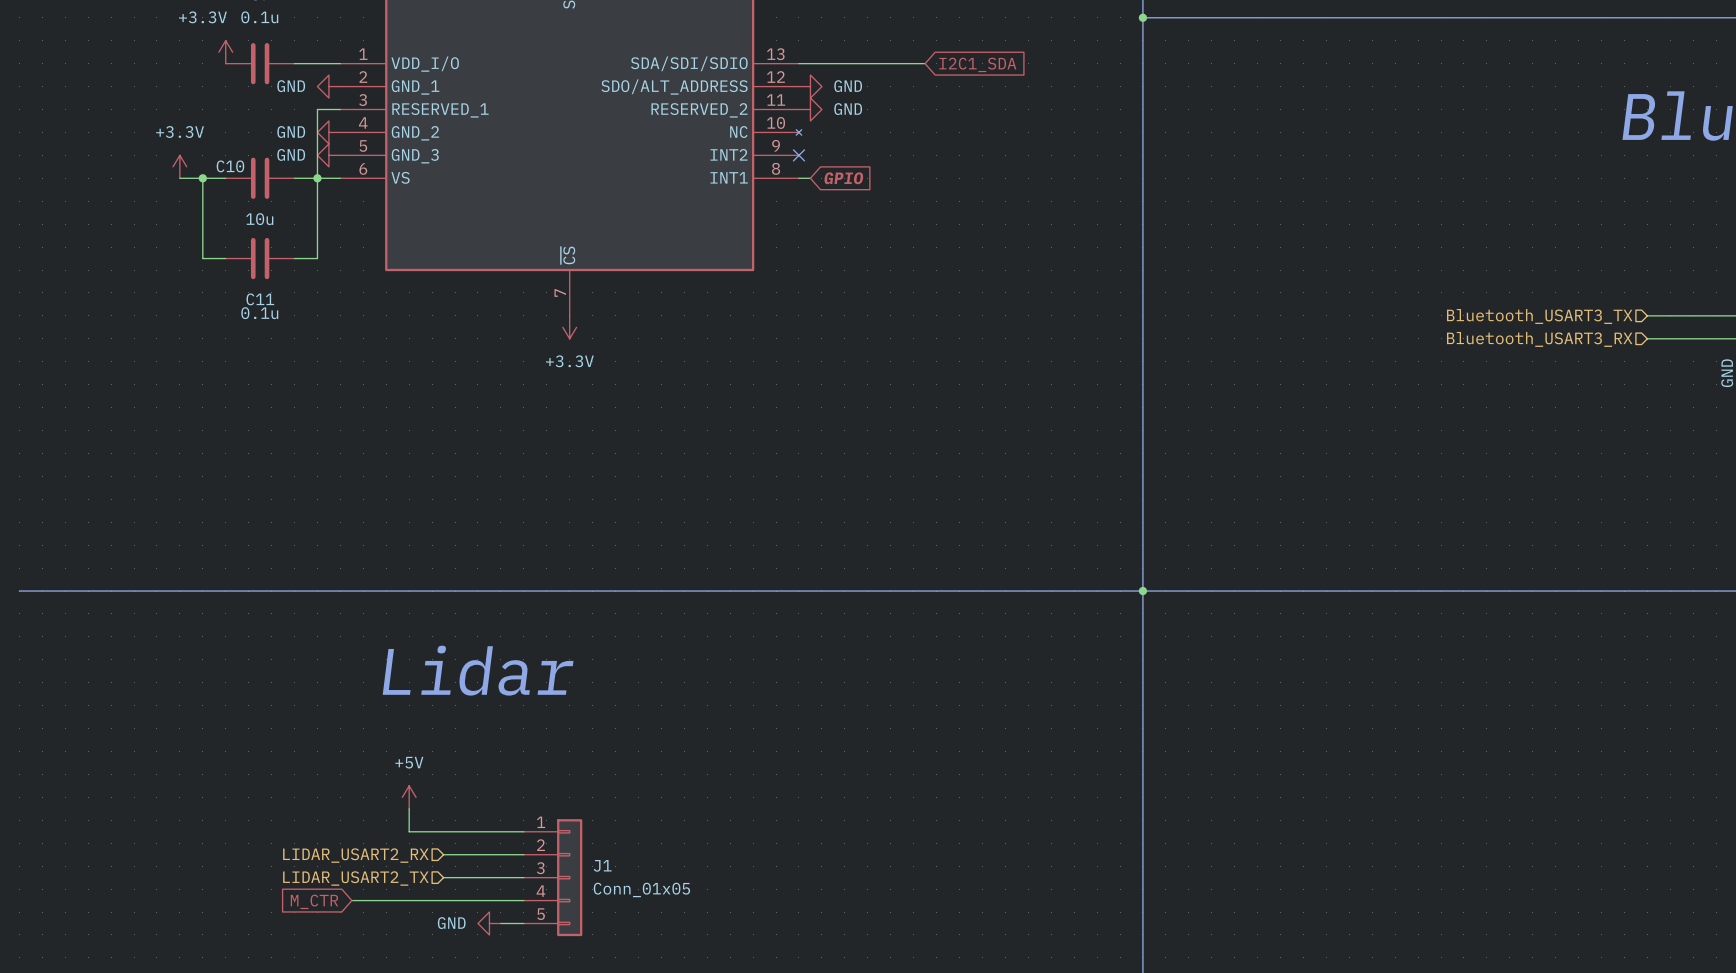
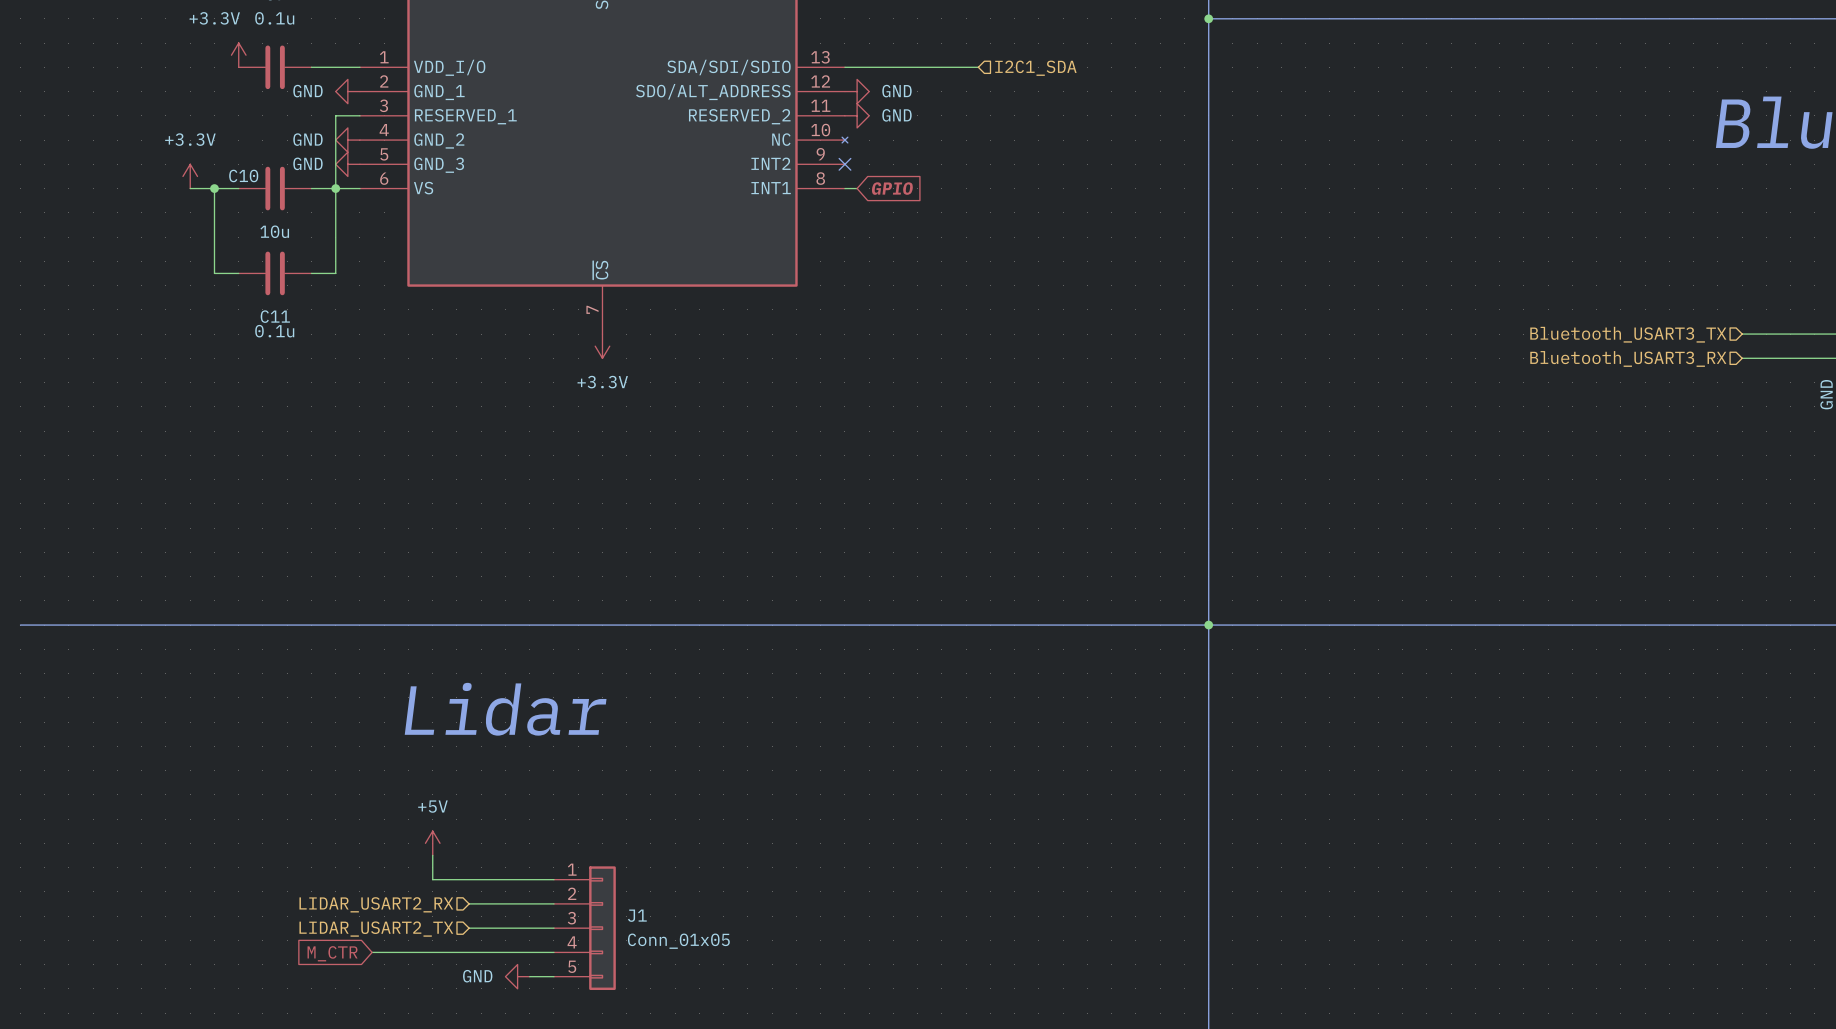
global label: I2C1_SDA (977, 64) -> none
hierarchical label: none -> I2C1_SDA (1035, 68)

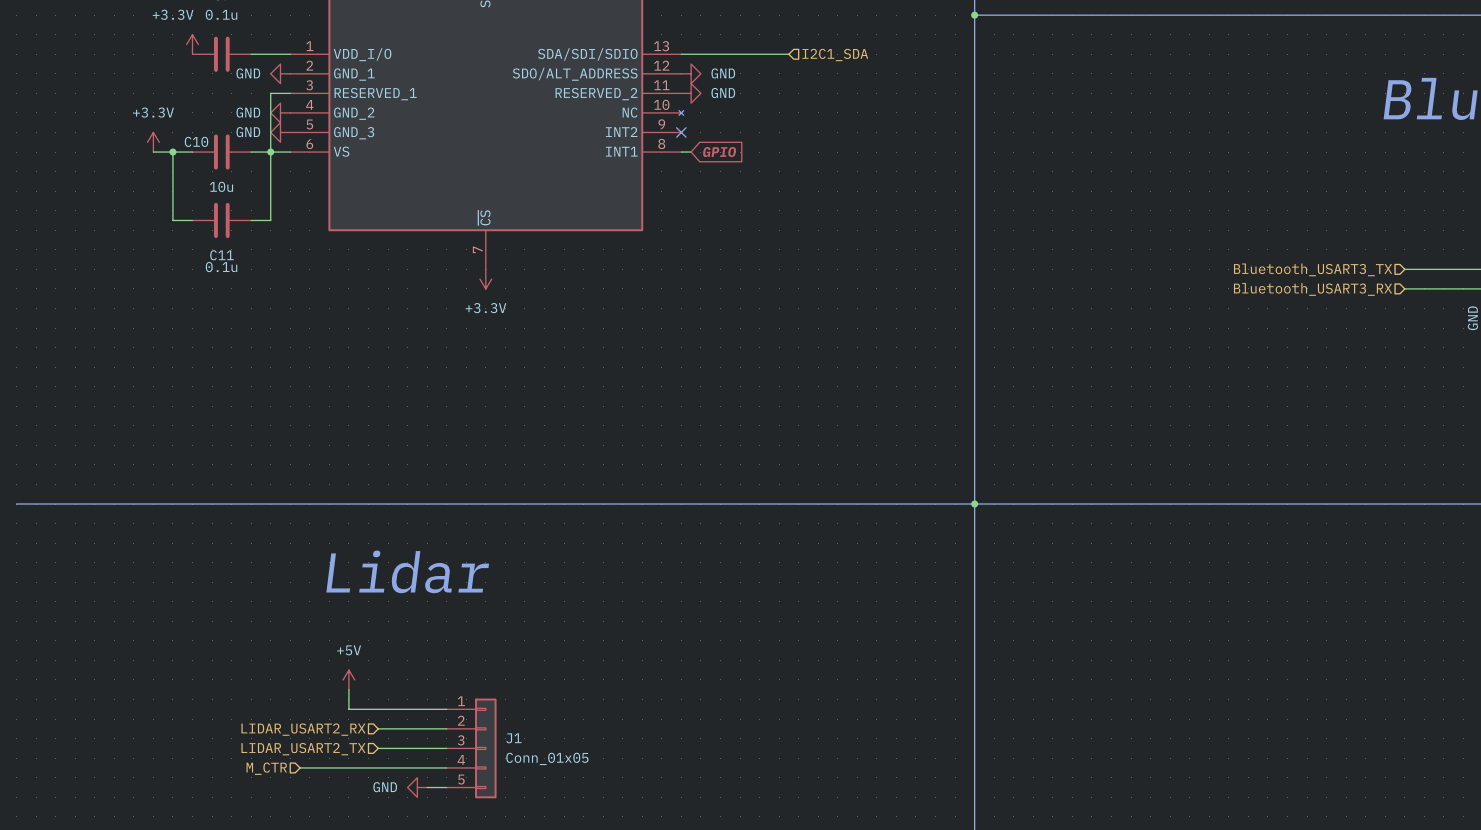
hierarchical label: none -> M_CTR (266, 768)
global label: M_CTR (332, 953) -> none

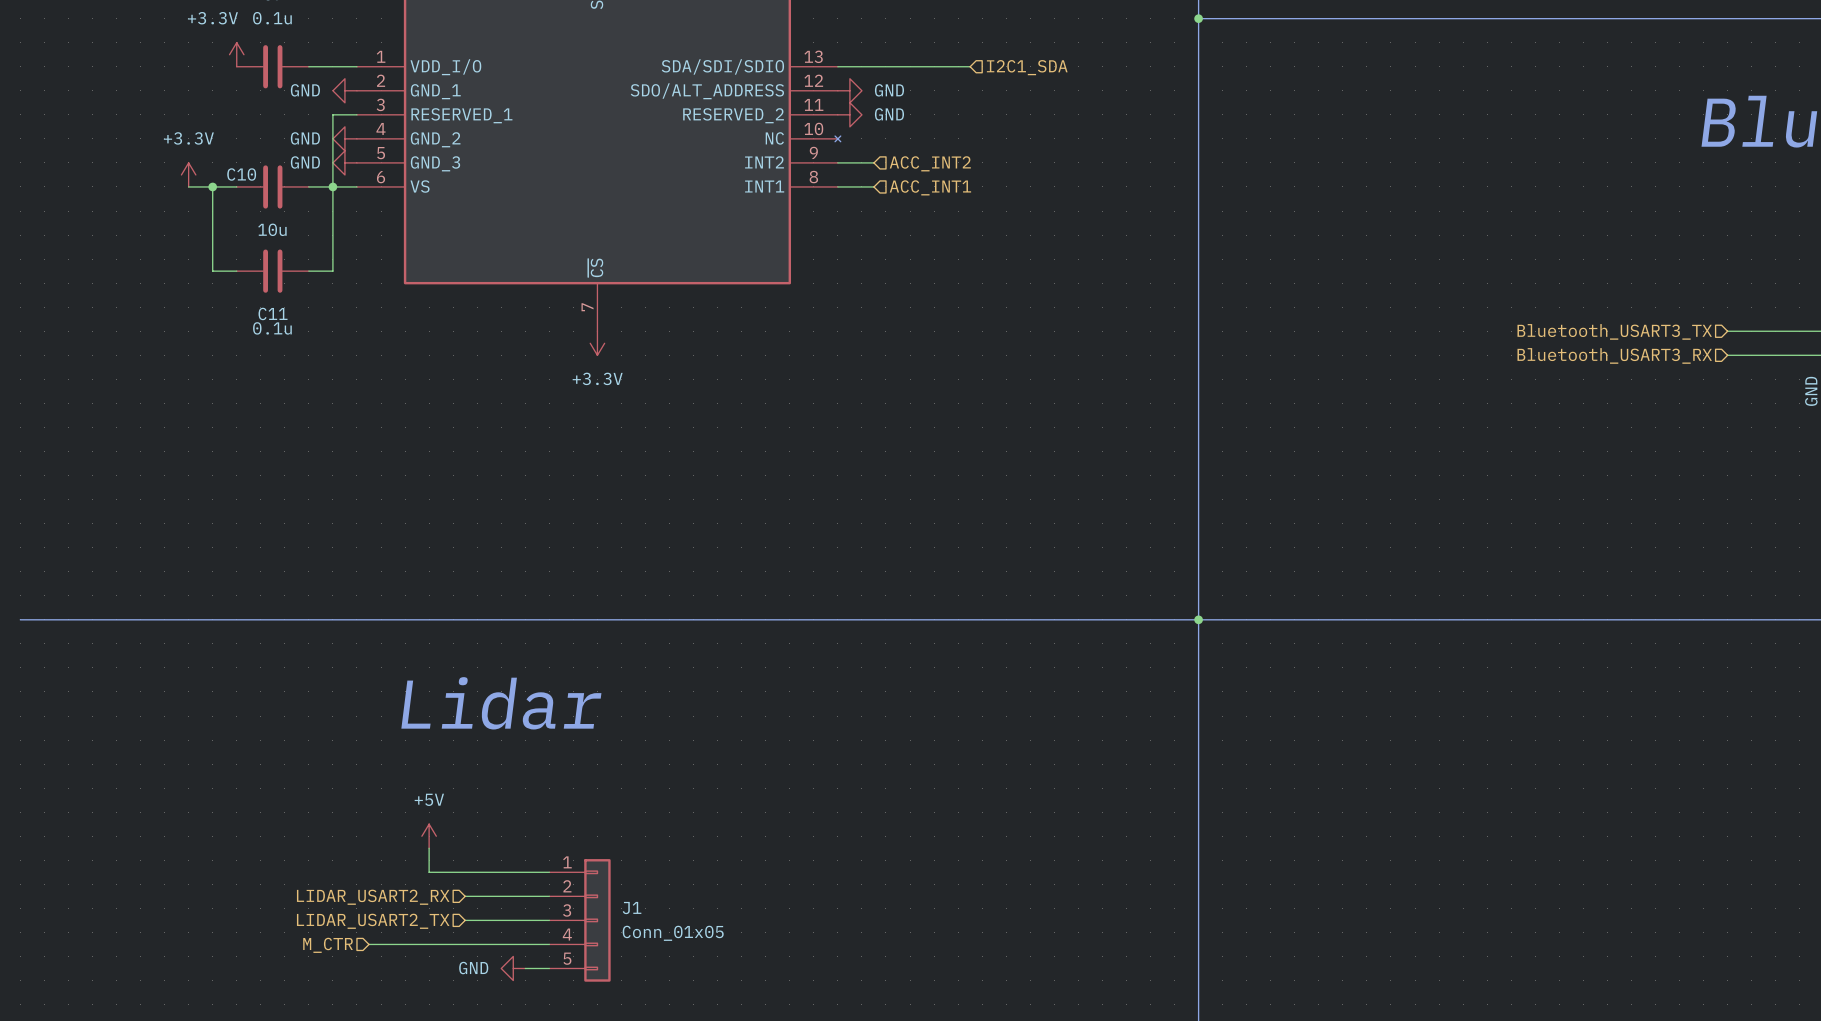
wire: none -> (837, 162) (873, 162)
no-connect mark: (681, 132) -> none
hierarchical label: none -> ACC_INT2 (930, 163)
wire: none -> (849, 186) (873, 186)
global label: GPIO (719, 152) -> none
hierarchical label: none -> ACC_INT1 (930, 187)

